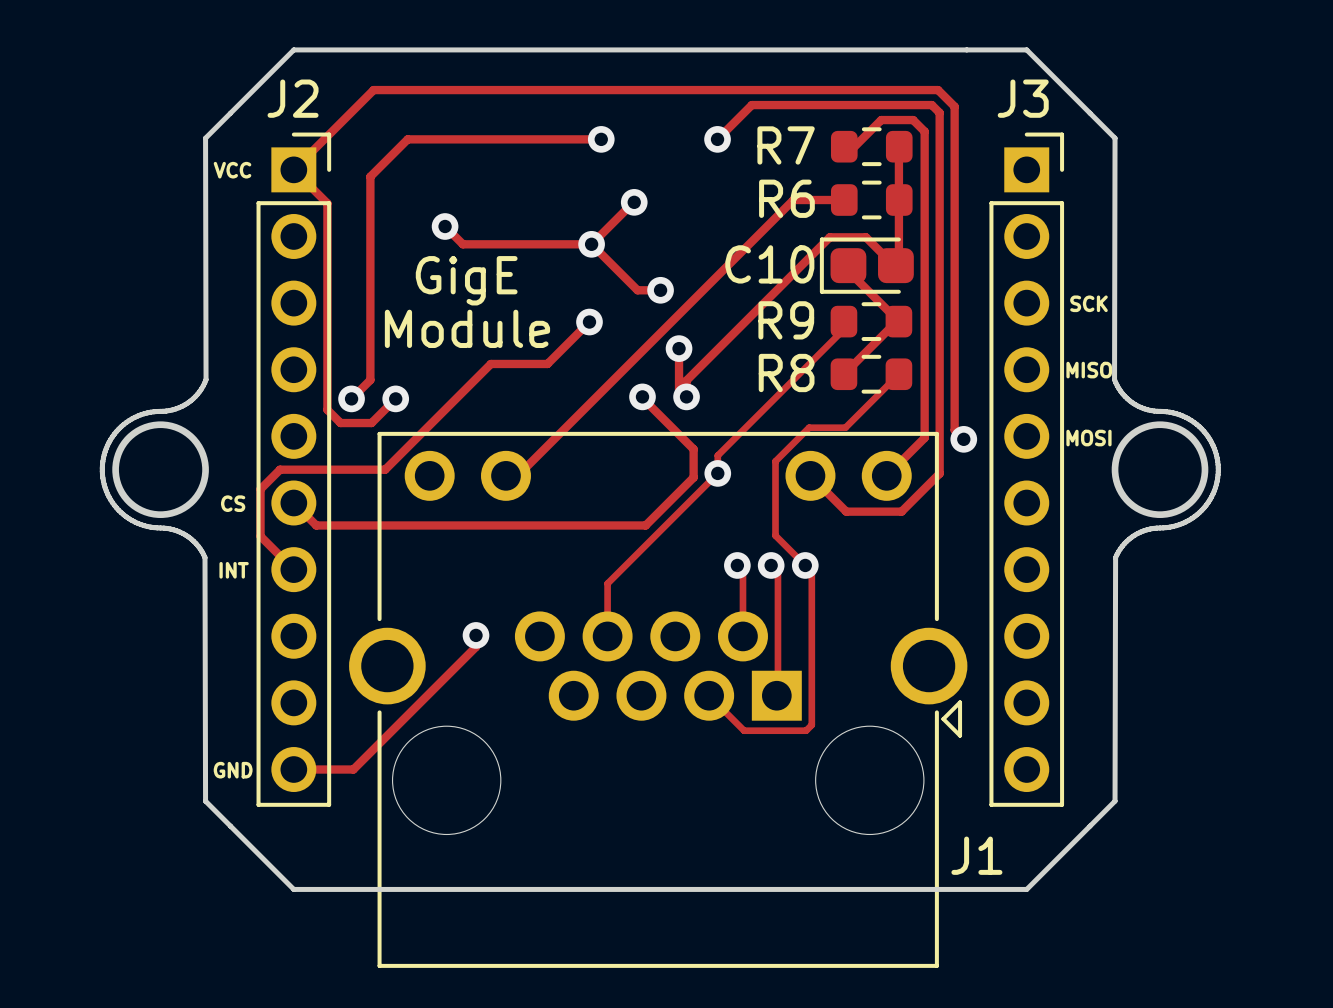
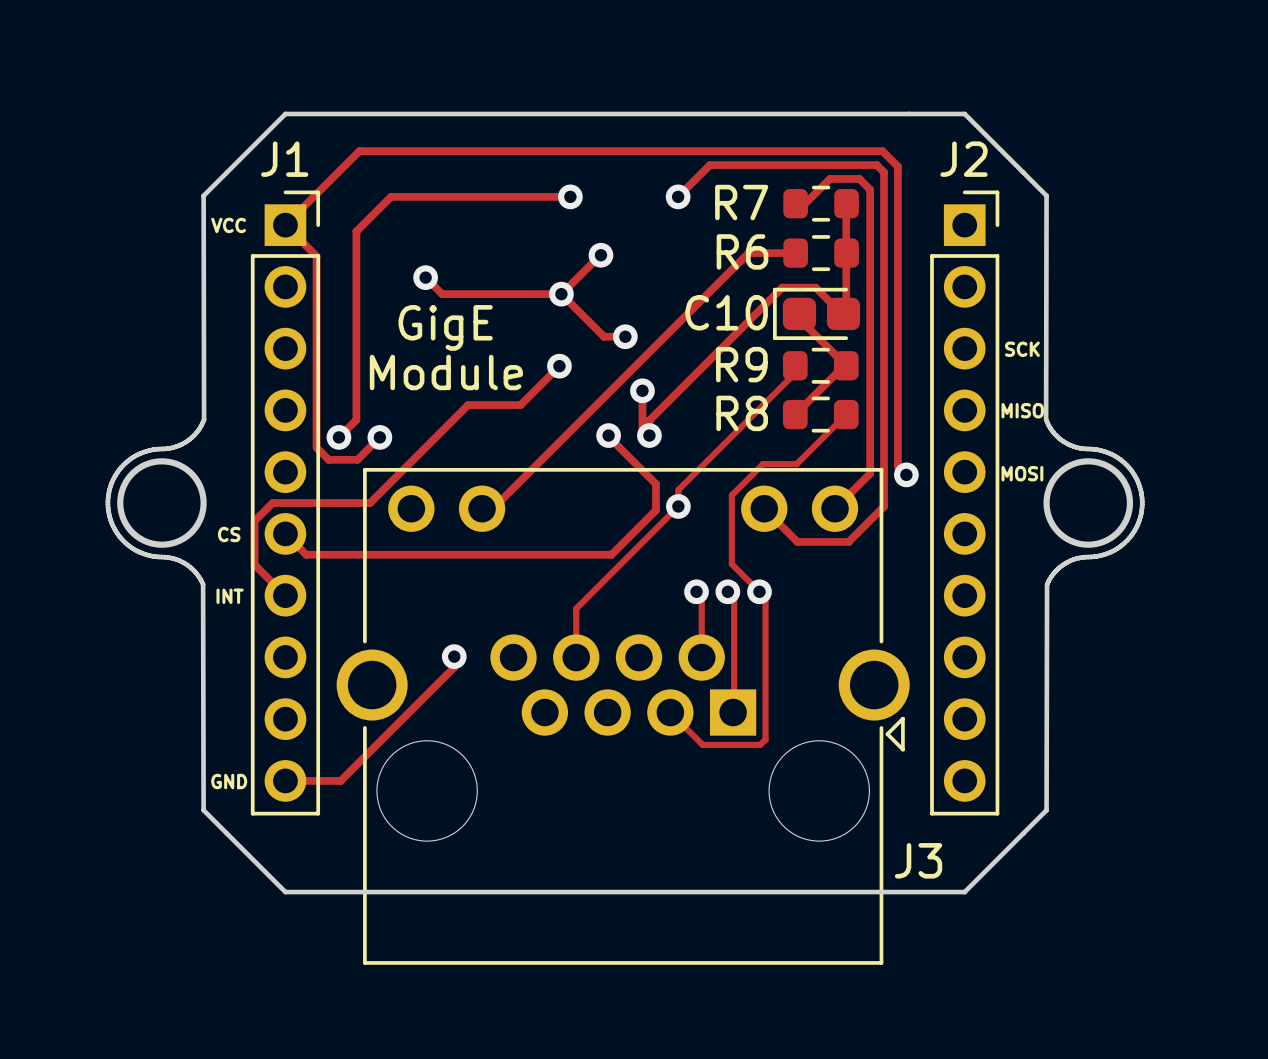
J2 name: J2 (293, 98) -> J1 (284, 159)
J3 name: J3 (1023, 98) -> J2 (964, 159)
J1 name: J1 (976, 855) -> J3 (918, 860)

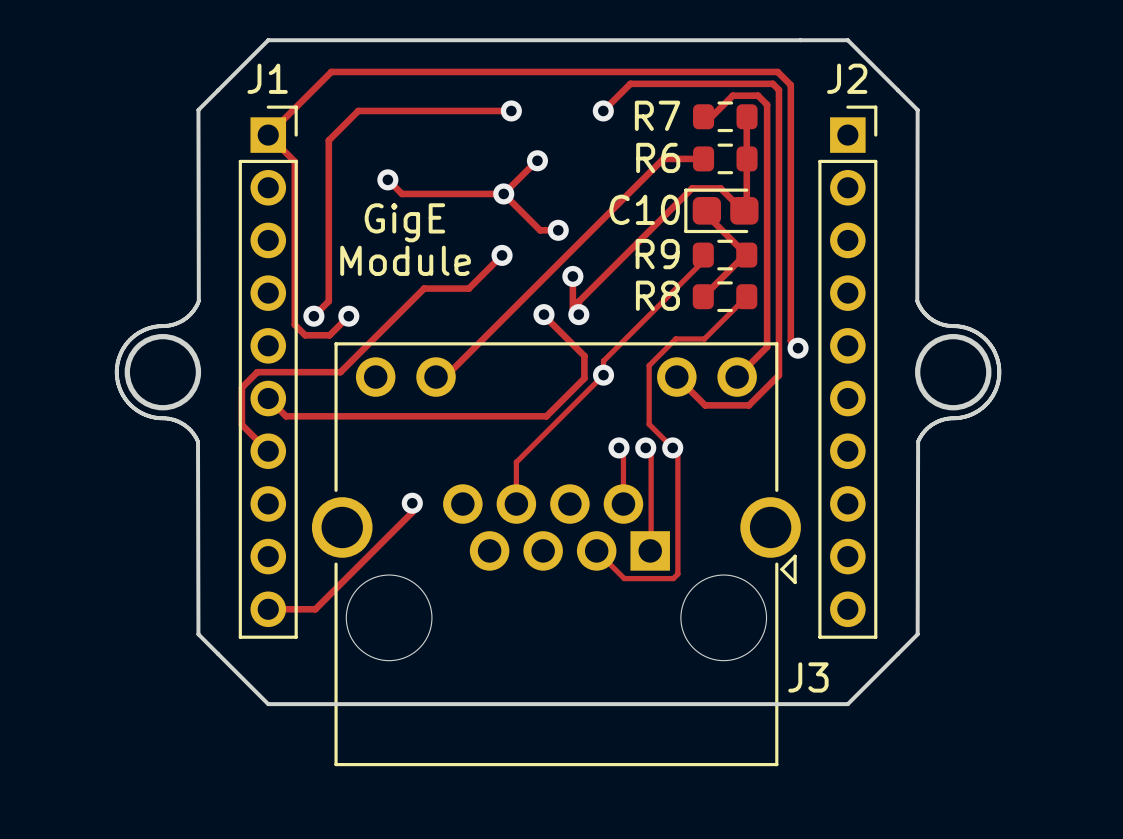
text: VCC (228, 225) -> none
text: SCK (1022, 349) -> none
text: MISO (1022, 410) -> none
text: MOSI (1022, 473) -> none
text: CS (229, 534) -> none
text: INT (230, 596) -> none
text: GND (229, 781) -> none

